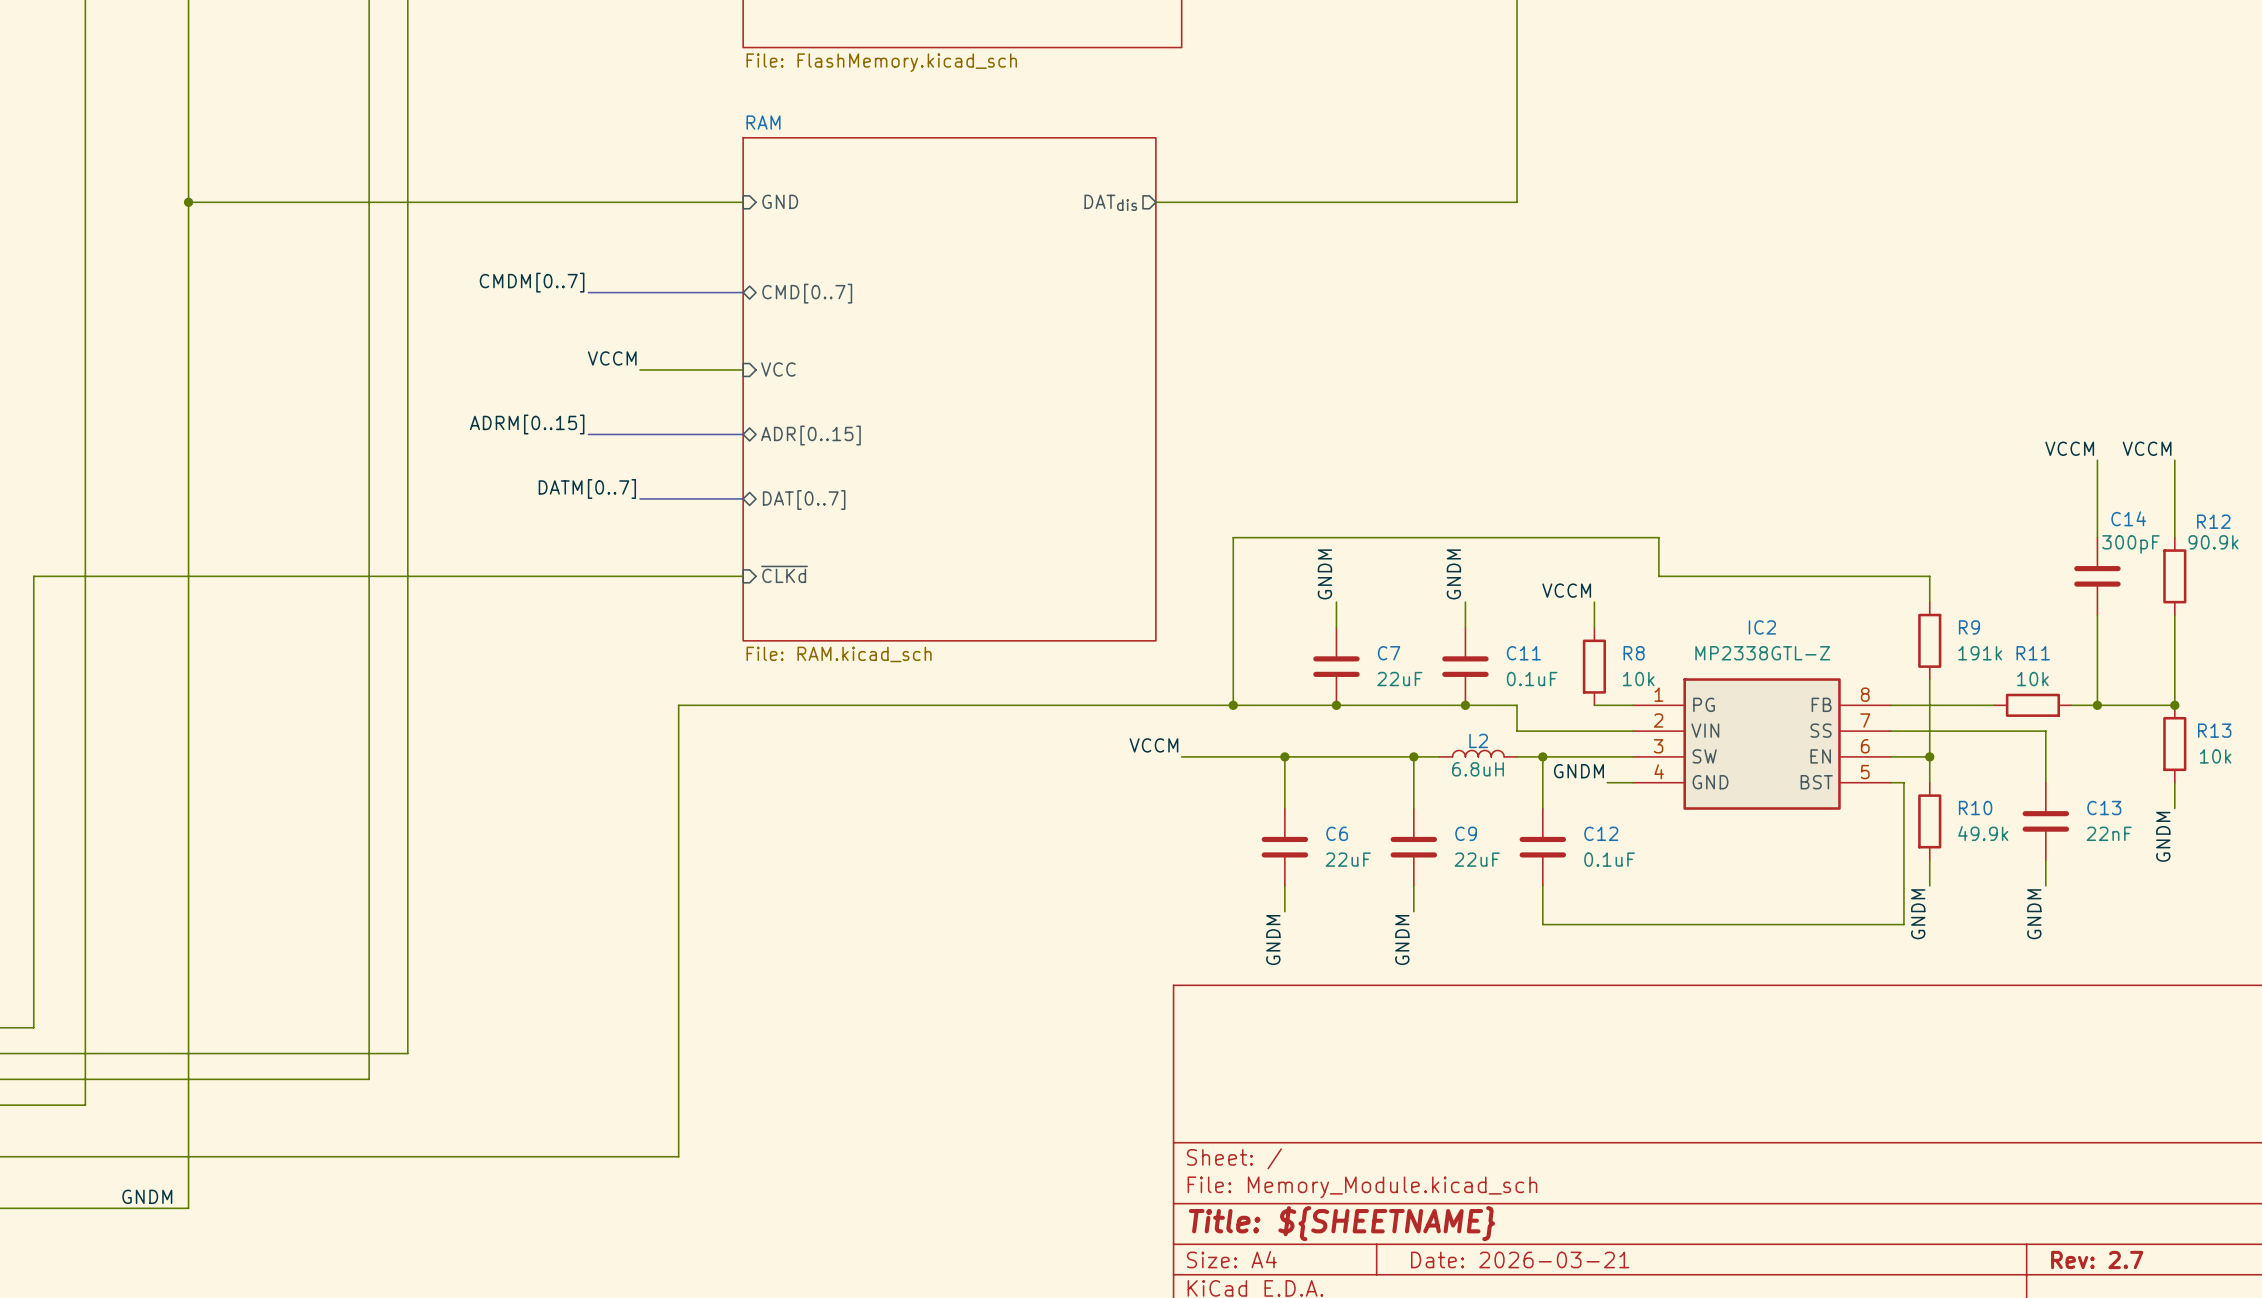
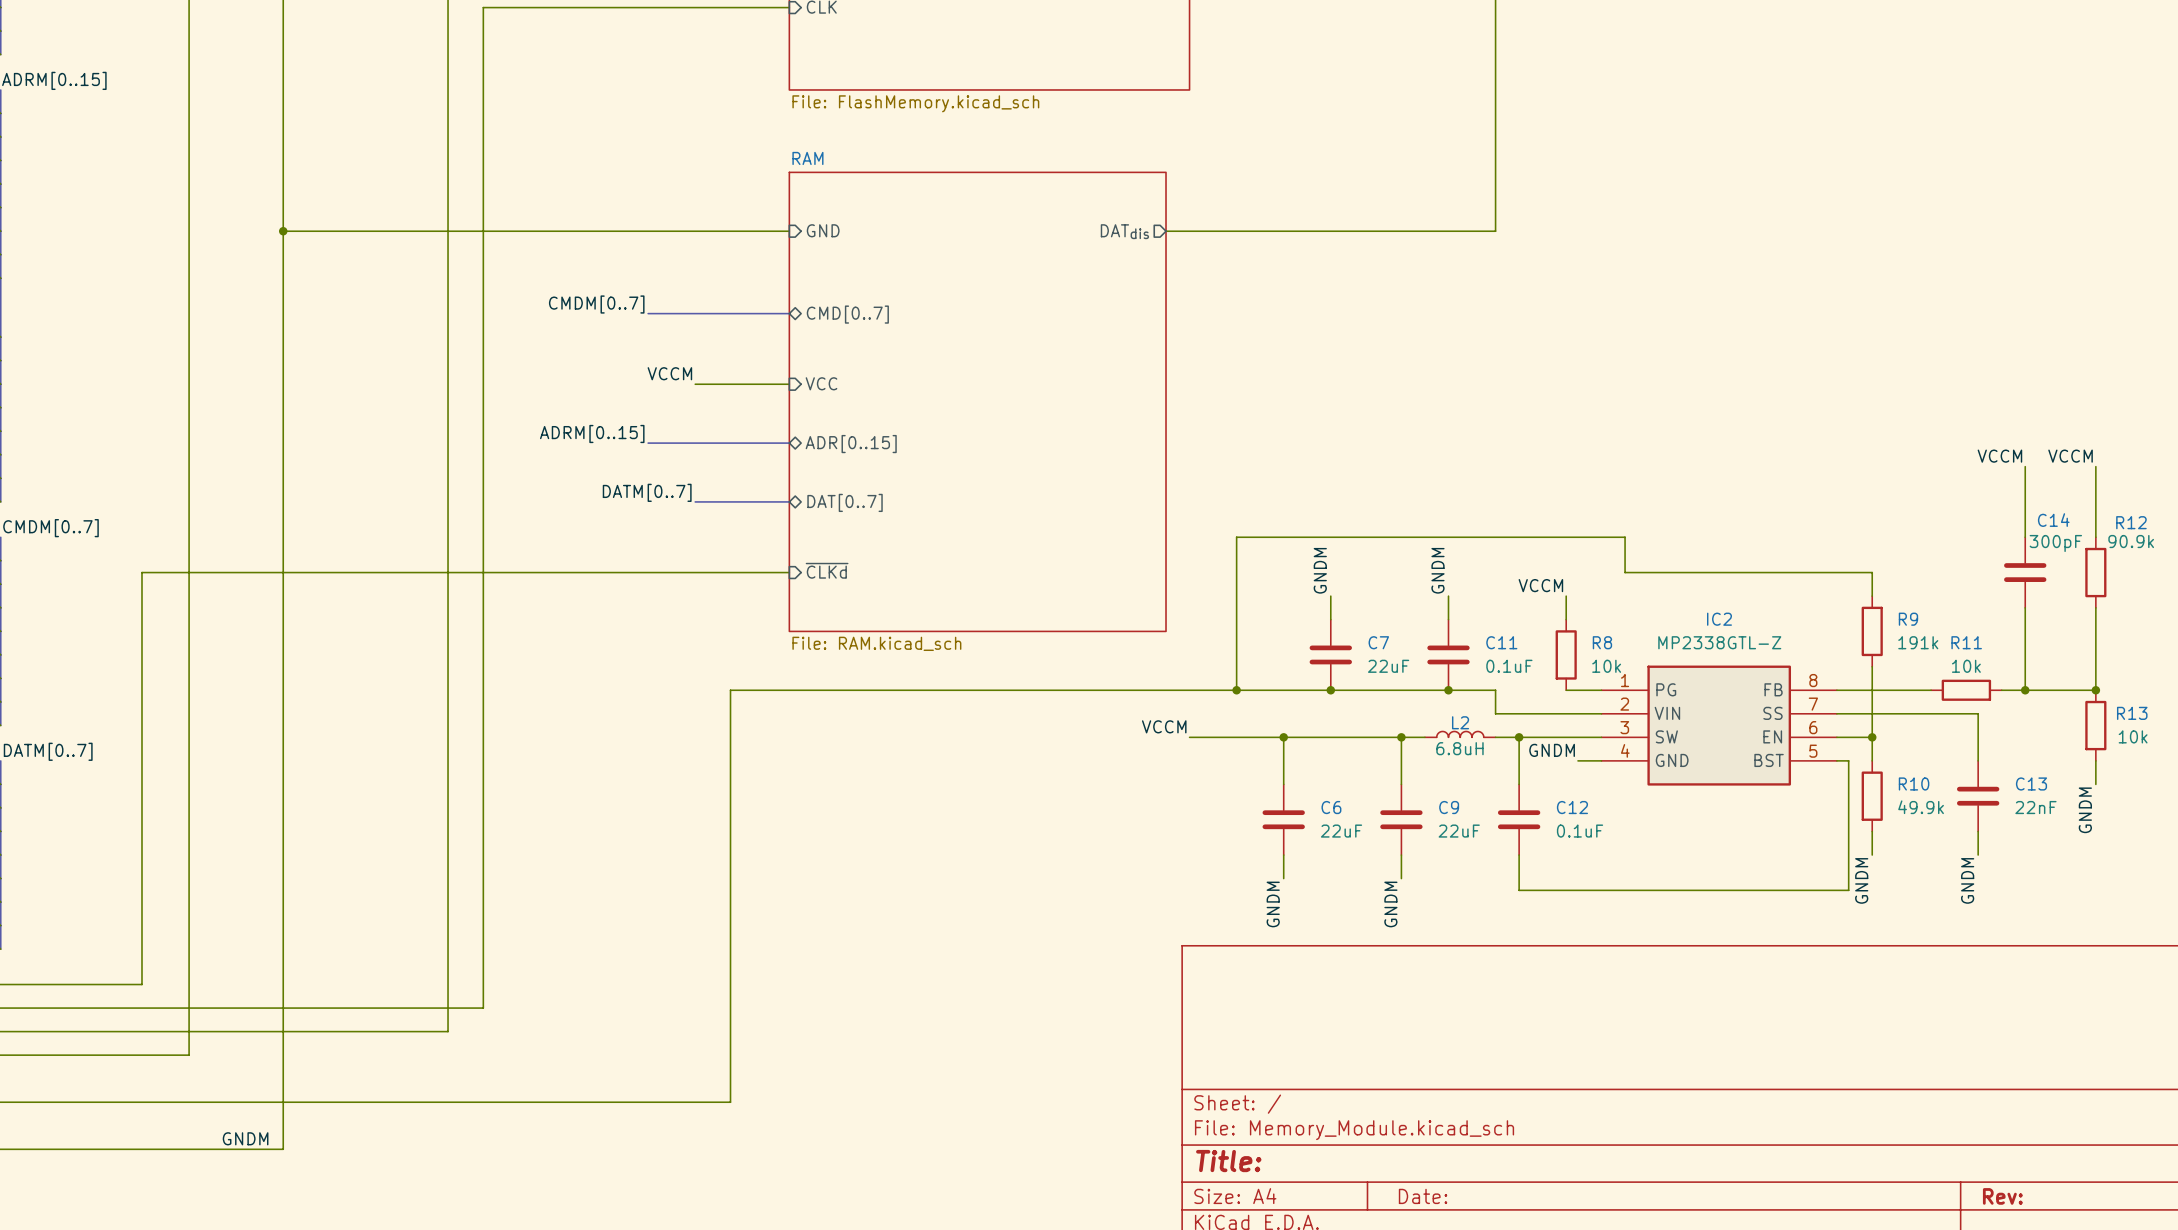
title block: Title: ${SHEETNAME} (1341, 1223) -> Title: (1228, 1161)
title block: Date: 2026-03-21 (1520, 1259) -> Date: (1423, 1196)
title block: Rev: 2.7 (2097, 1259) -> Rev: (2002, 1196)

